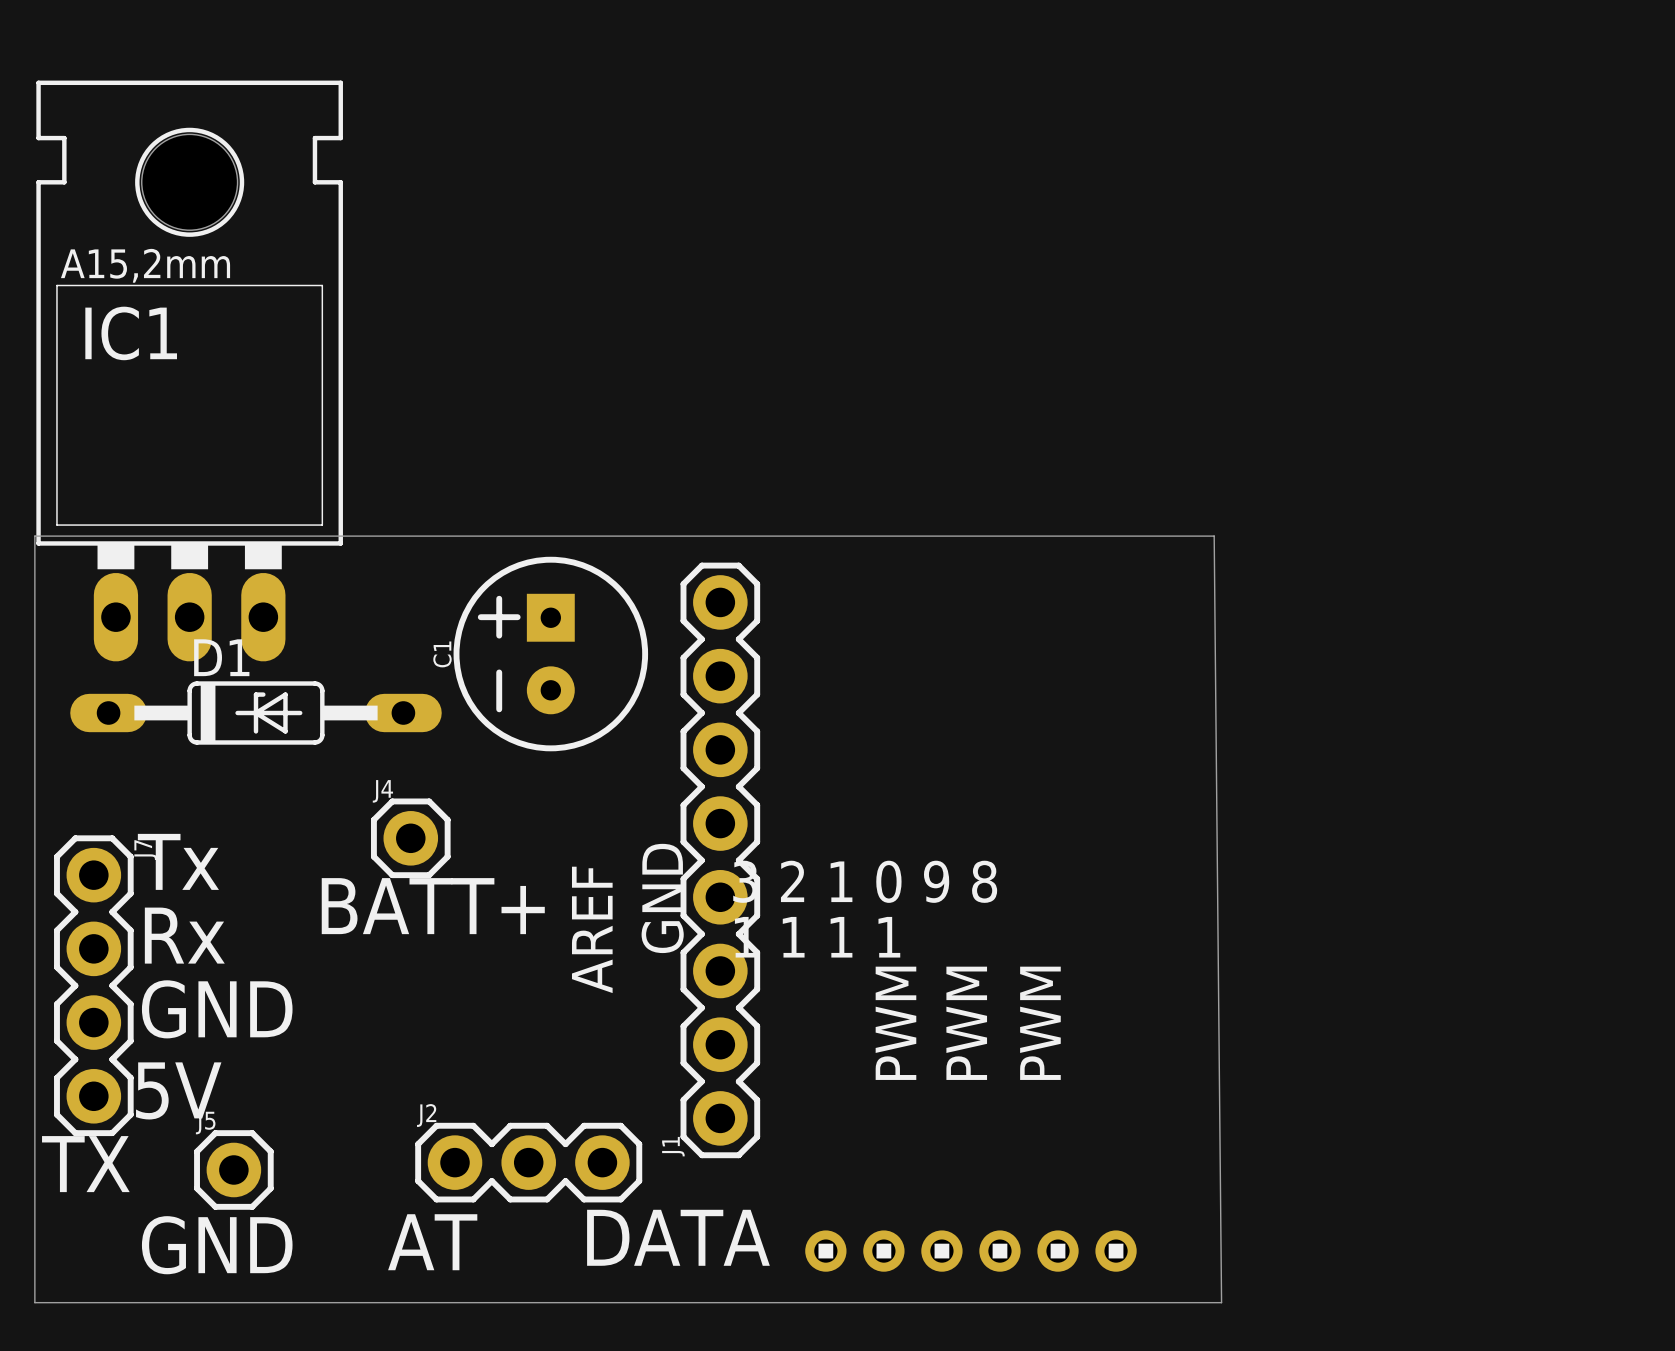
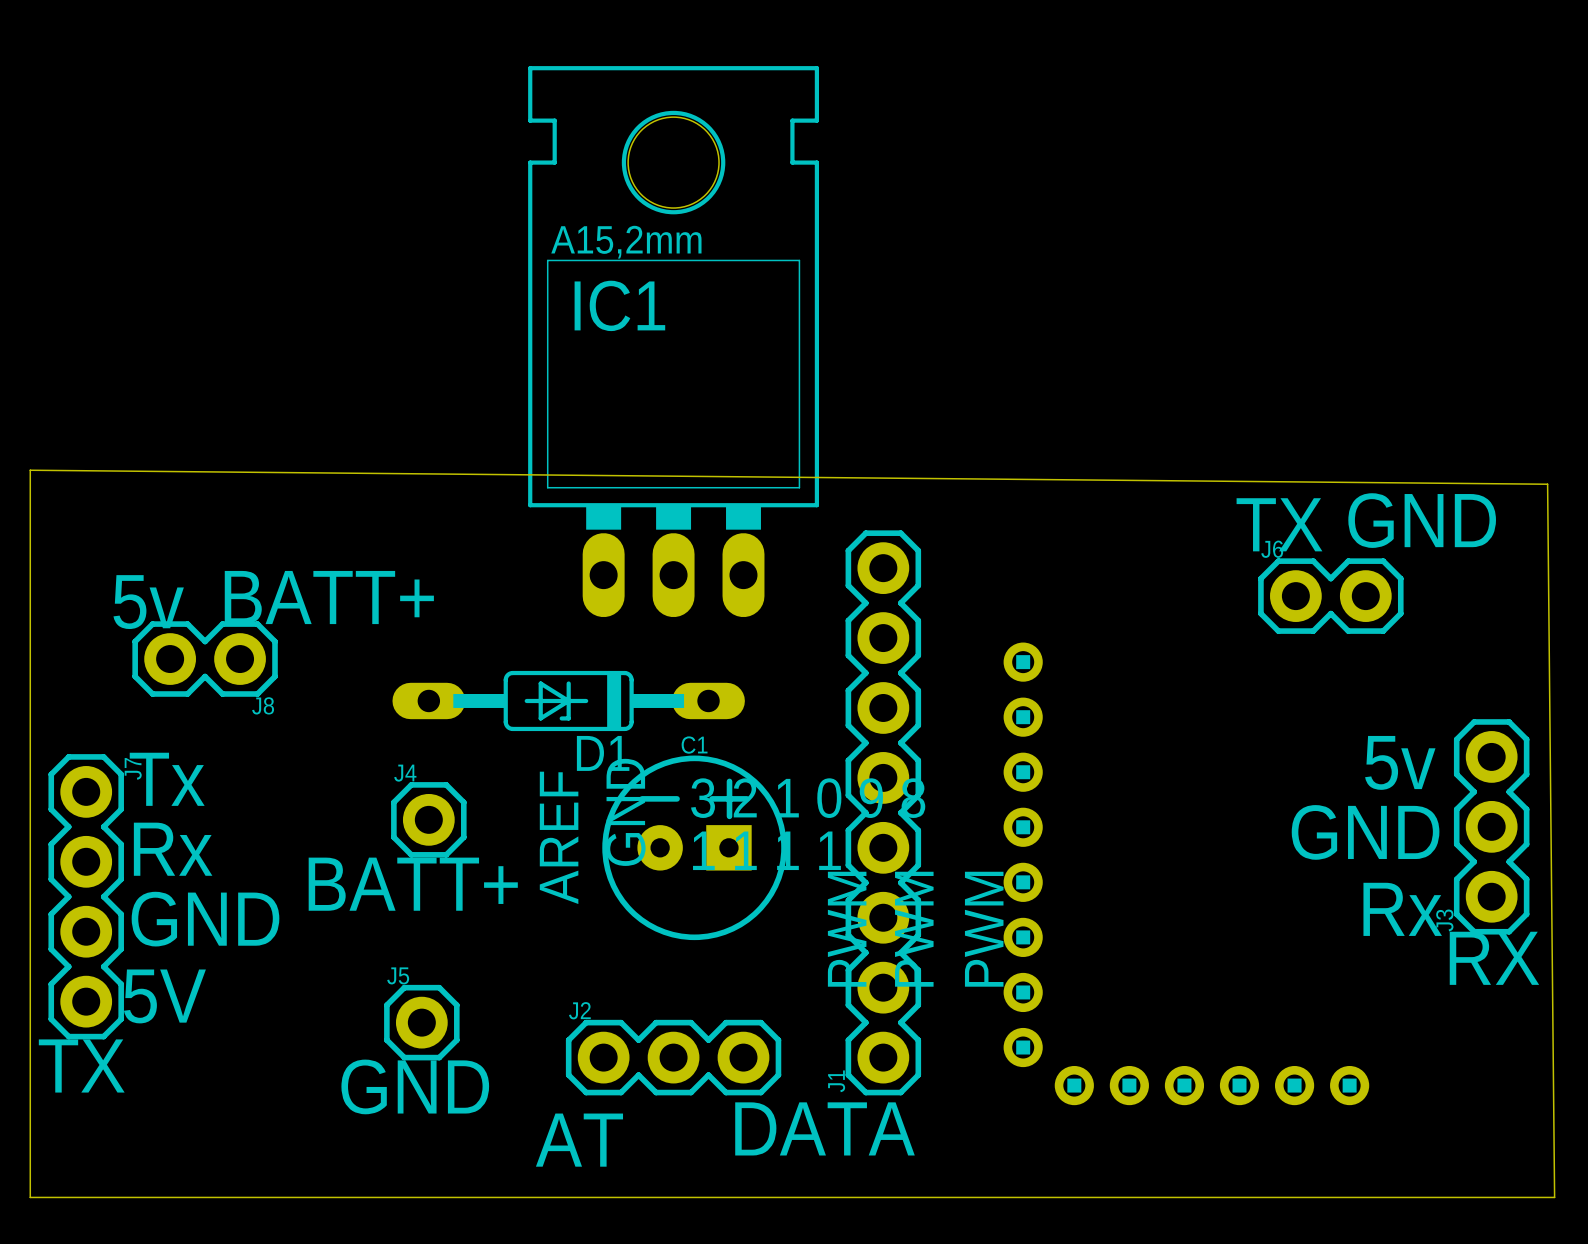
IC1 position: (189, 371) -> (673, 341)
board edge: (34, 536) (1214, 536) (1221, 1302) -> (30, 470) (1547, 484) (1554, 1197) (1156, 1197)
text: none -> GND (1422, 520)
text: none -> TX (1279, 524)
C1 rotation: 0° (550, 654) -> 90° clockwise (694, 847)
C1 position: (550, 654) -> (694, 847)
J6: none -> (1330, 596)
text: none -> BATT+ (329, 597)
text: none -> 5v (148, 602)
D1 rotation: 0° (255, 713) -> 180° (568, 700)
D1 position: (255, 713) -> (568, 700)
J8: none -> (205, 659)
J4 position: (410, 838) -> (428, 819)
text: none -> 5v (1400, 762)
J1 position: (720, 860) -> (883, 812)
text position: BATT+ (433, 906) -> BATT+ (413, 884)
J3: none -> (1491, 826)
text: none -> GND (1365, 832)
part: none -> (1023, 854)
text: none -> Rx (1402, 909)
text: none -> RX (1494, 958)
J2 position: (528, 1162) -> (673, 1057)
J5 position: (233, 1169) -> (421, 1022)
text position: DATA (678, 1237) -> DATA (824, 1128)
text position: AT (432, 1242) -> AT (579, 1140)
text position: GND (217, 1245) -> GND (415, 1086)
part position: (970, 1251) -> (1211, 1085)

